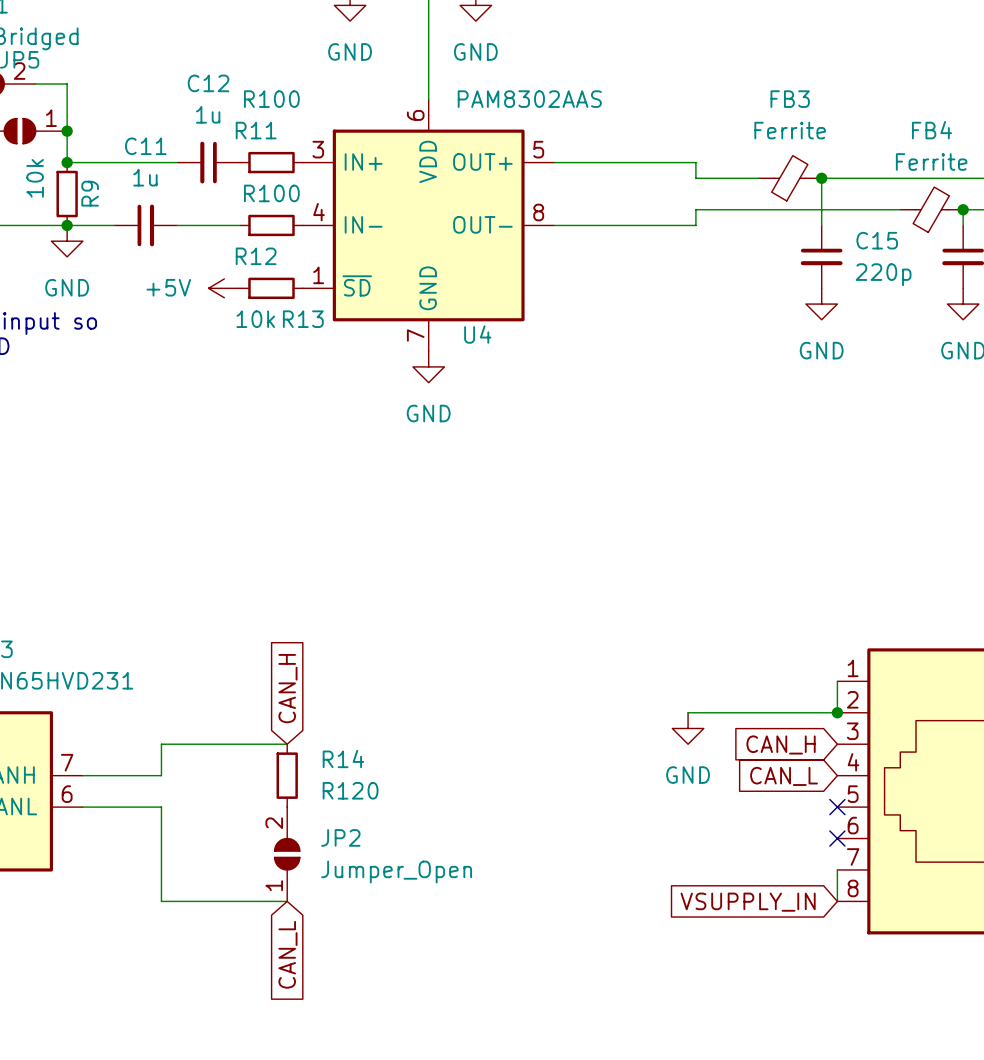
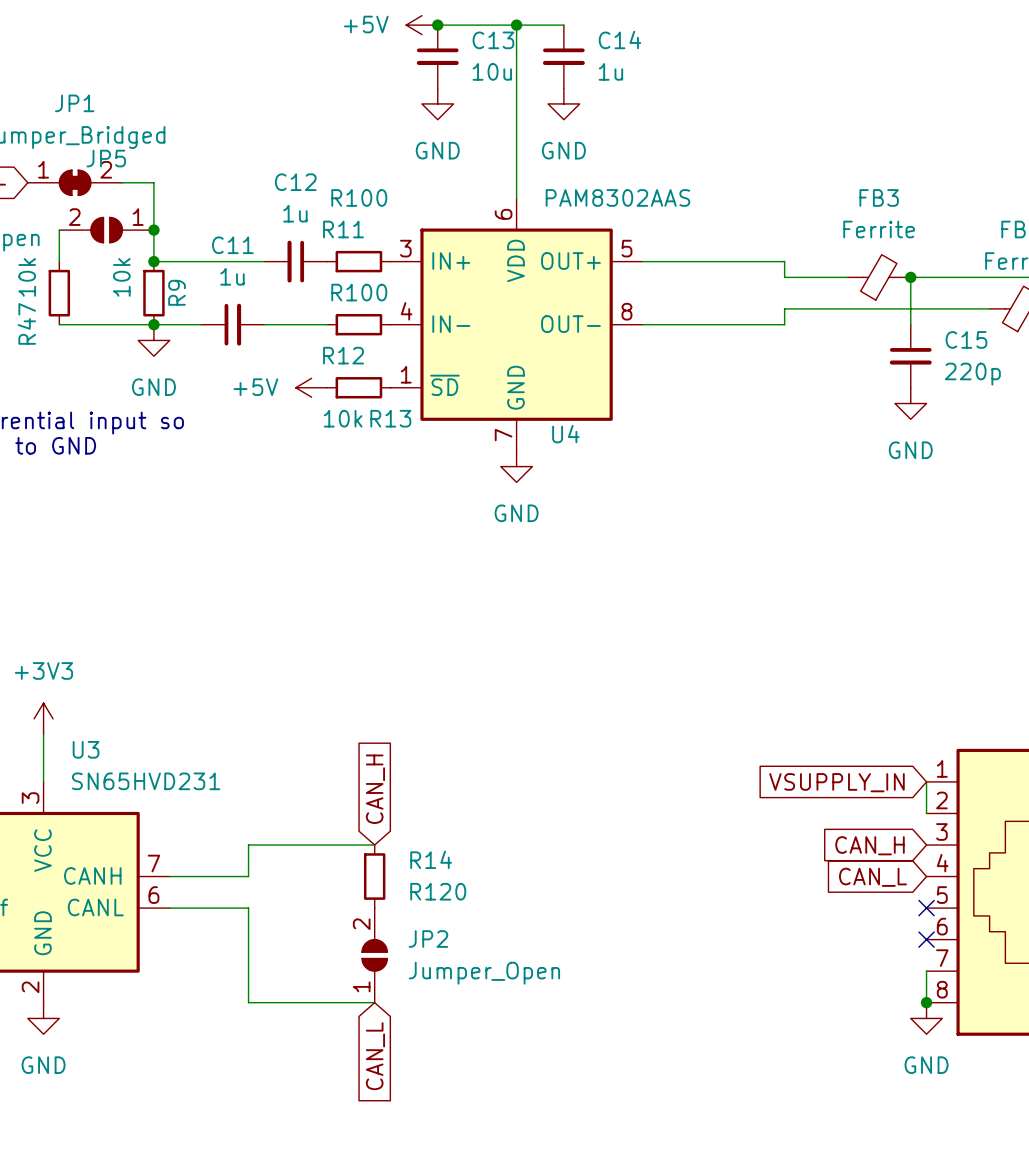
wire: (688, 712) (837, 712) -> none
junction: (837, 712) -> none
power symbol position: GND (688, 728) -> GND (926, 1018)
junction: none -> (926, 1002)
global label position: VSUPPLY_IN (748, 902) -> VSUPPLY_IN (836, 782)

